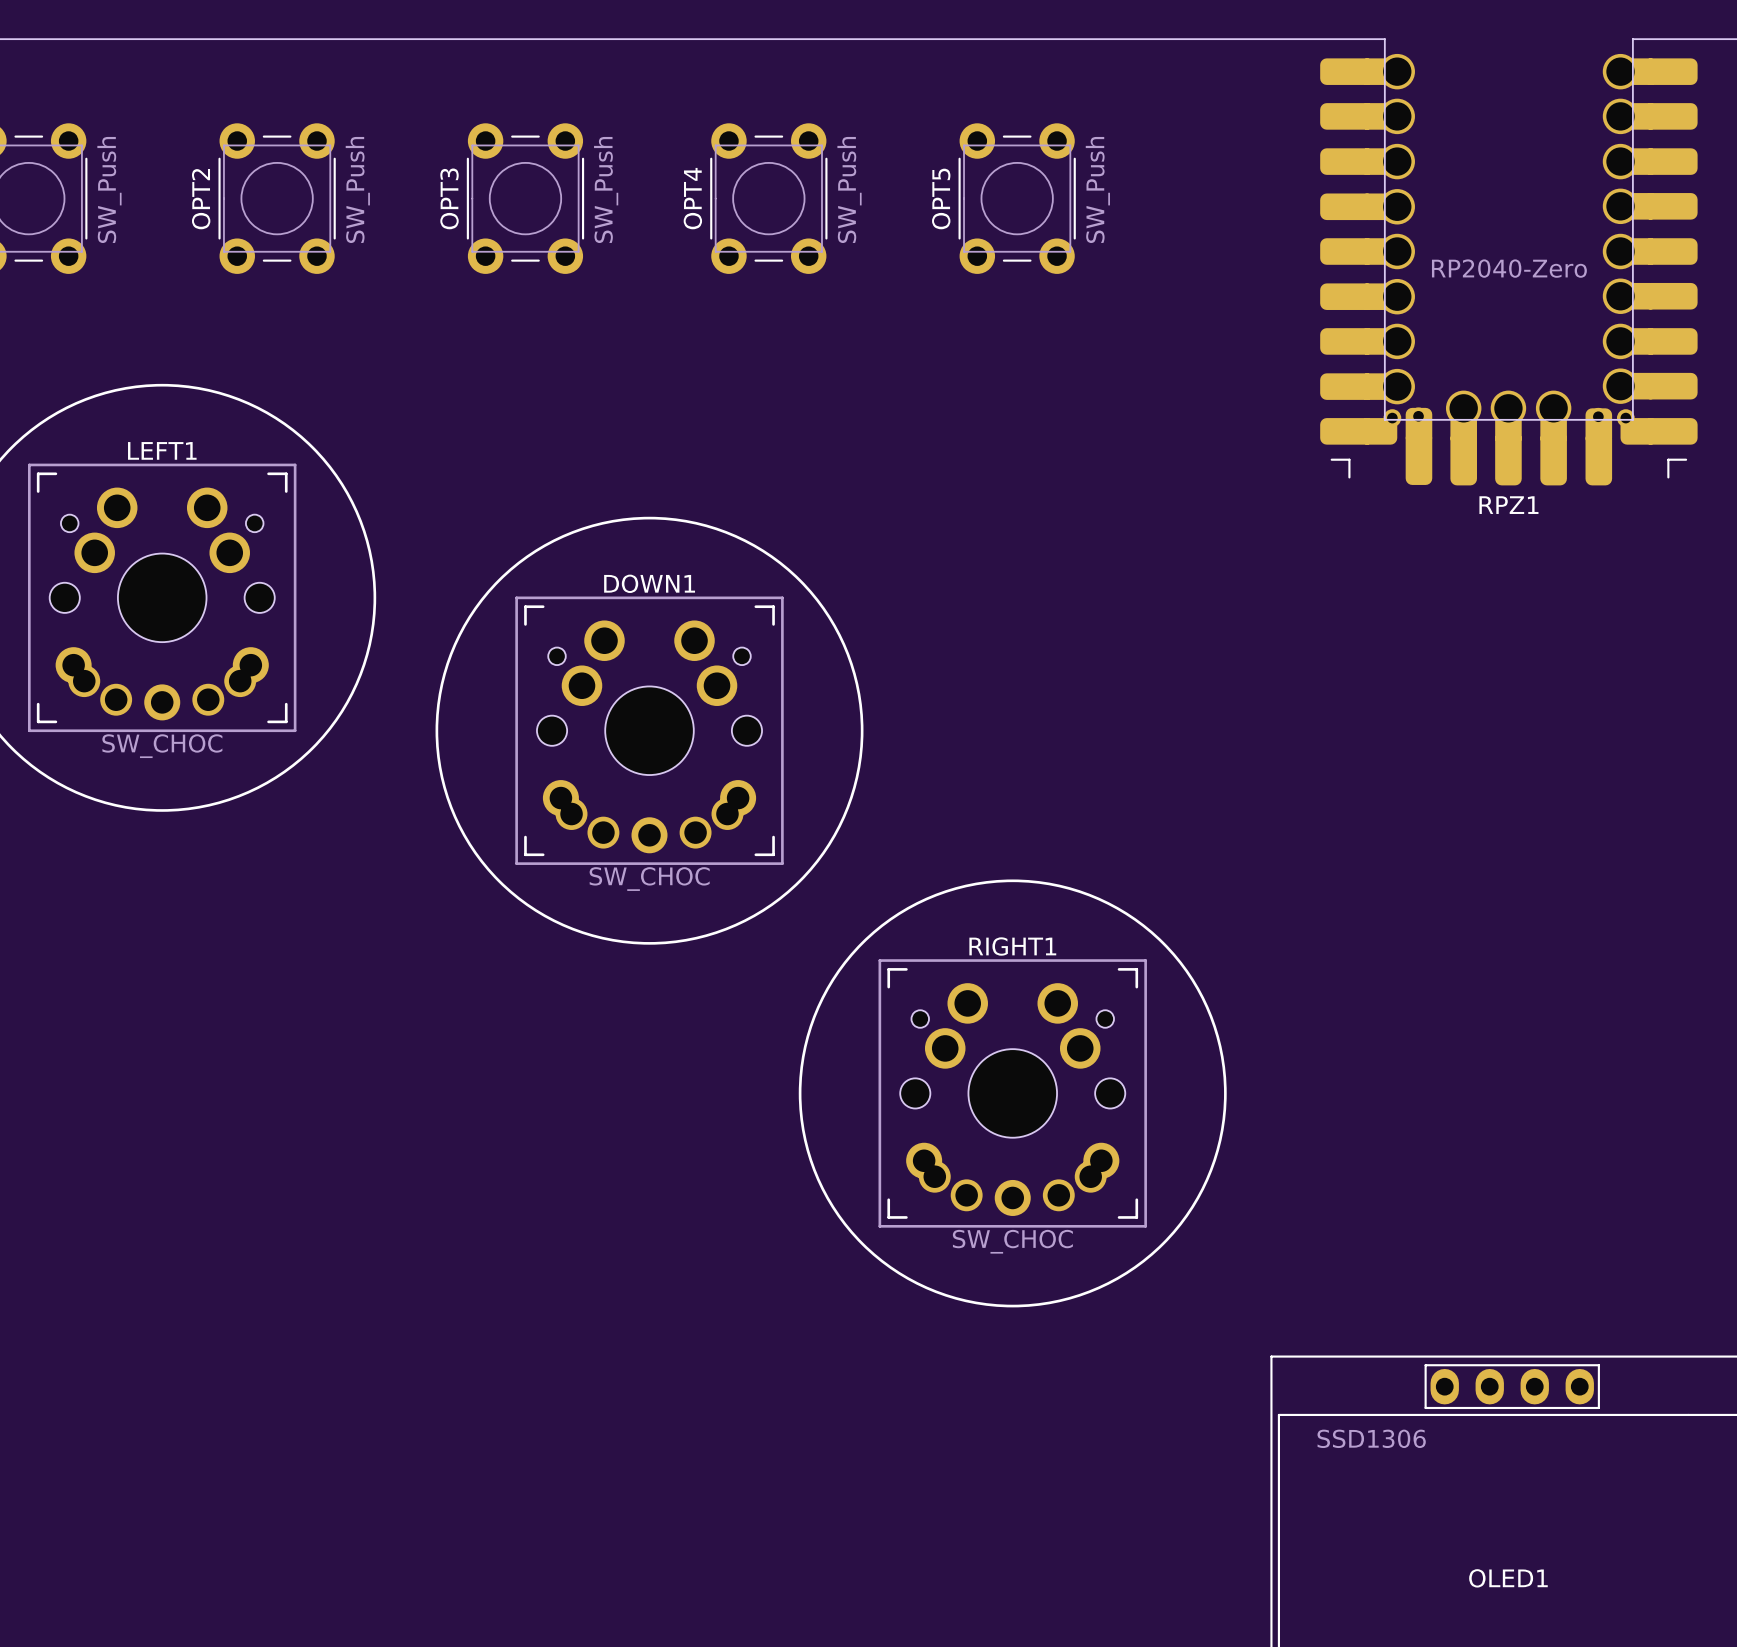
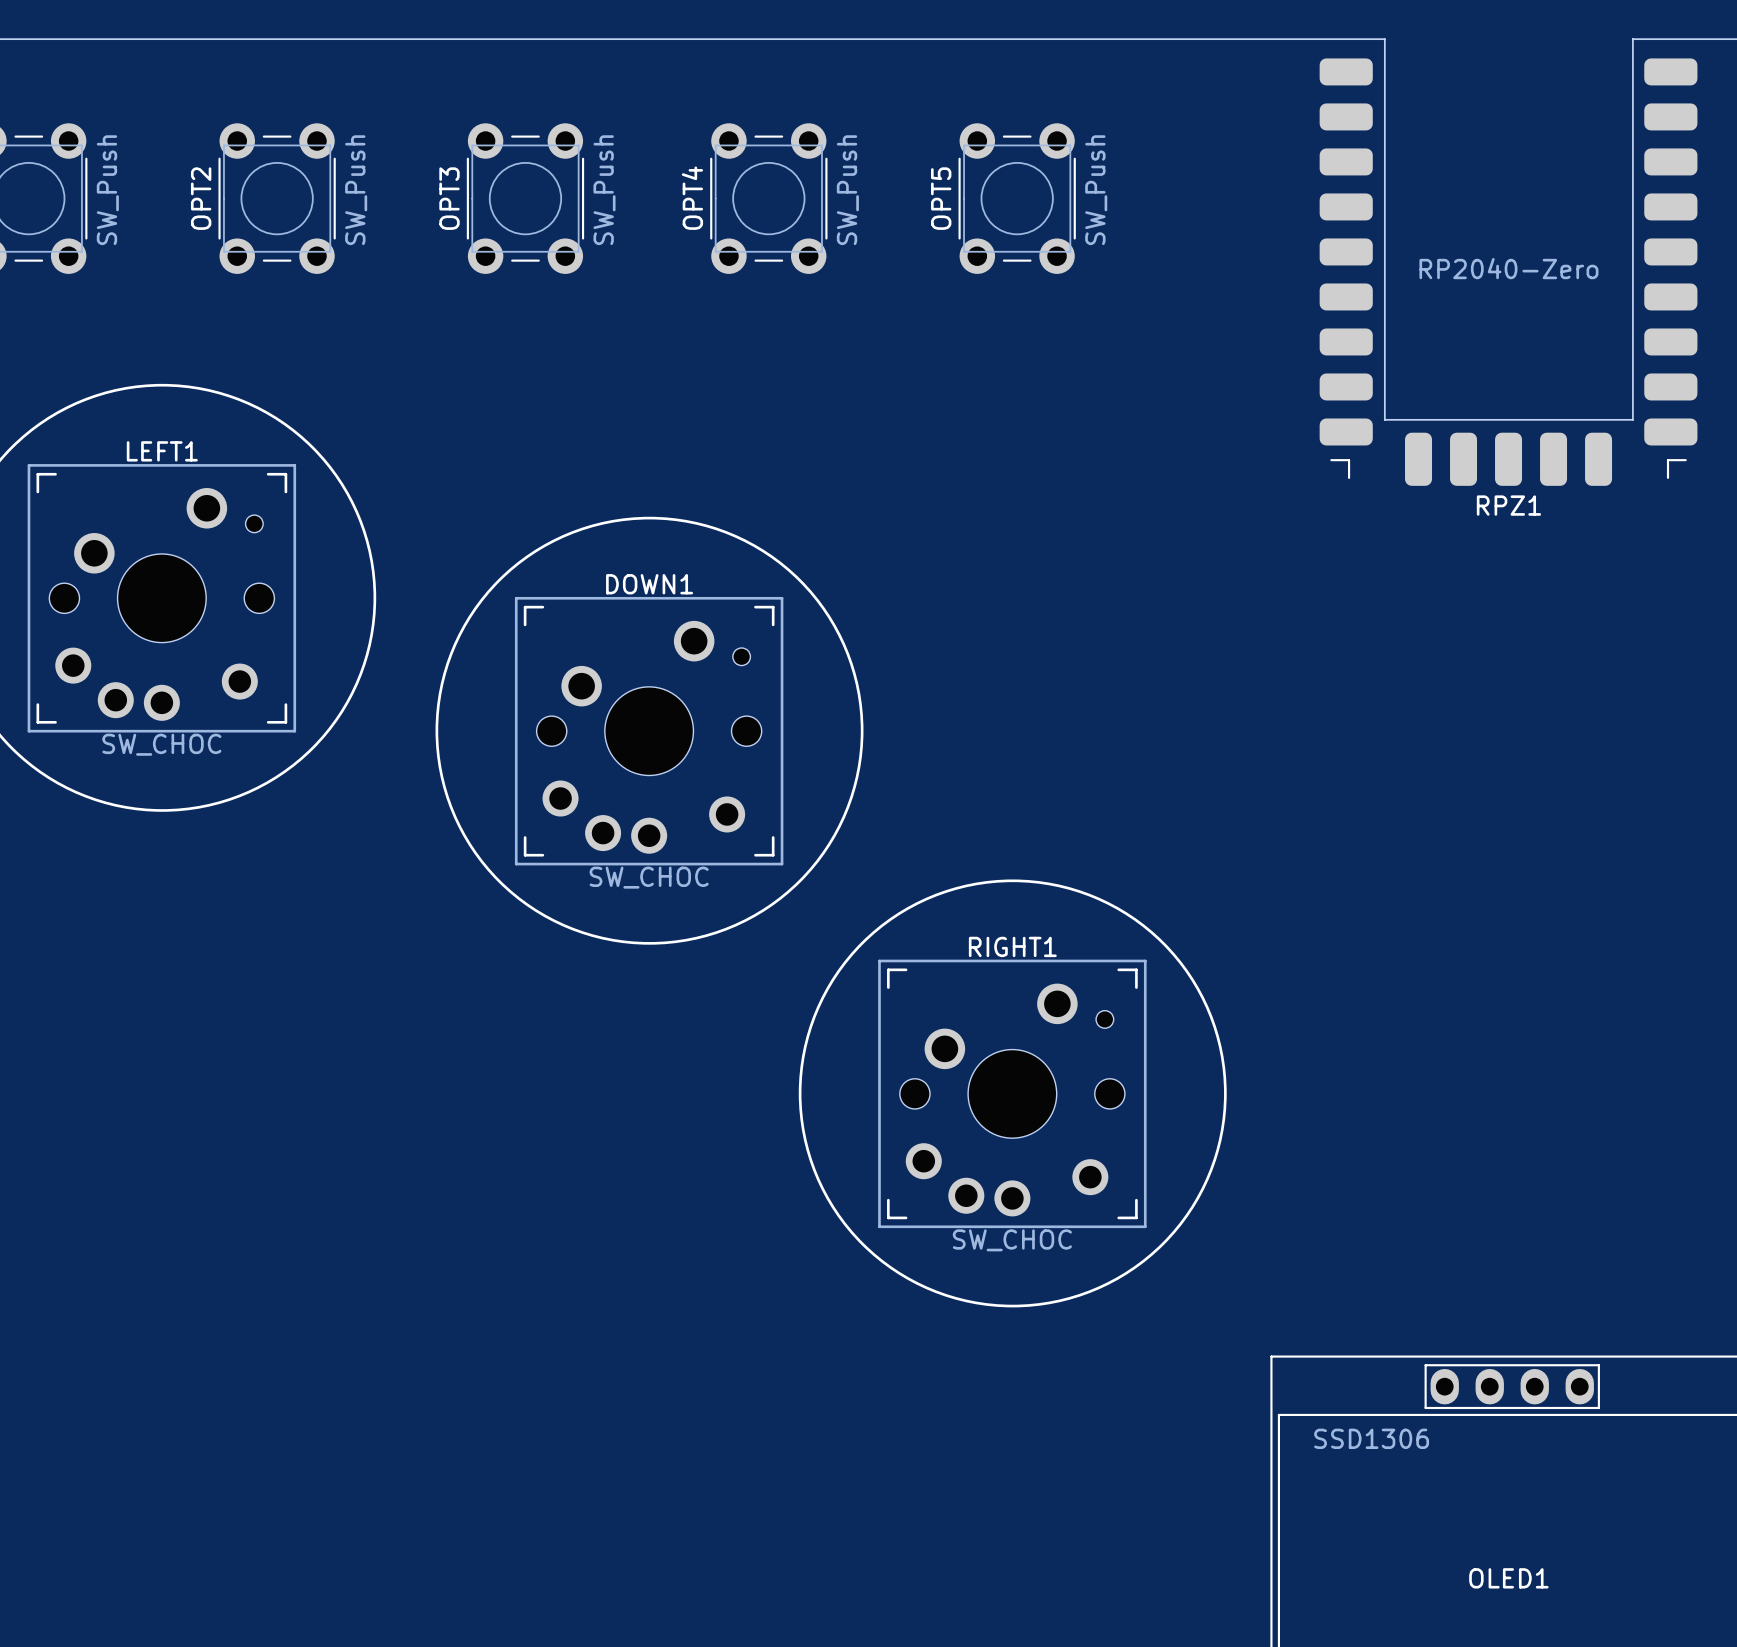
RPZ1 footprint: [1320, 53, 1698, 486] -> [1319, 58, 1698, 486]
LEFT1 footprint: [28, 463, 297, 733] -> [27, 464, 297, 733]
DOWN1 footprint: [515, 596, 784, 865] -> [514, 596, 784, 866]
RIGHT1 footprint: [878, 959, 1147, 1228] -> [878, 959, 1147, 1229]

